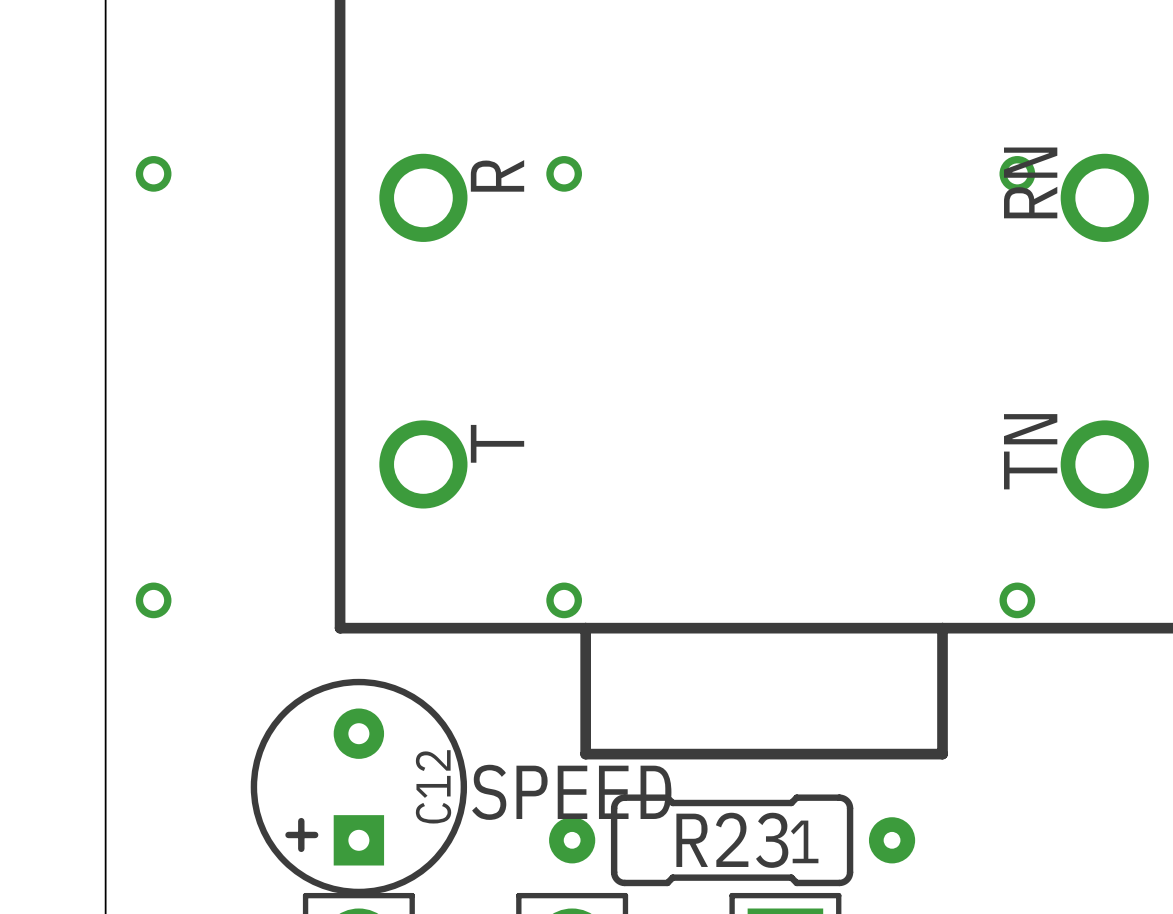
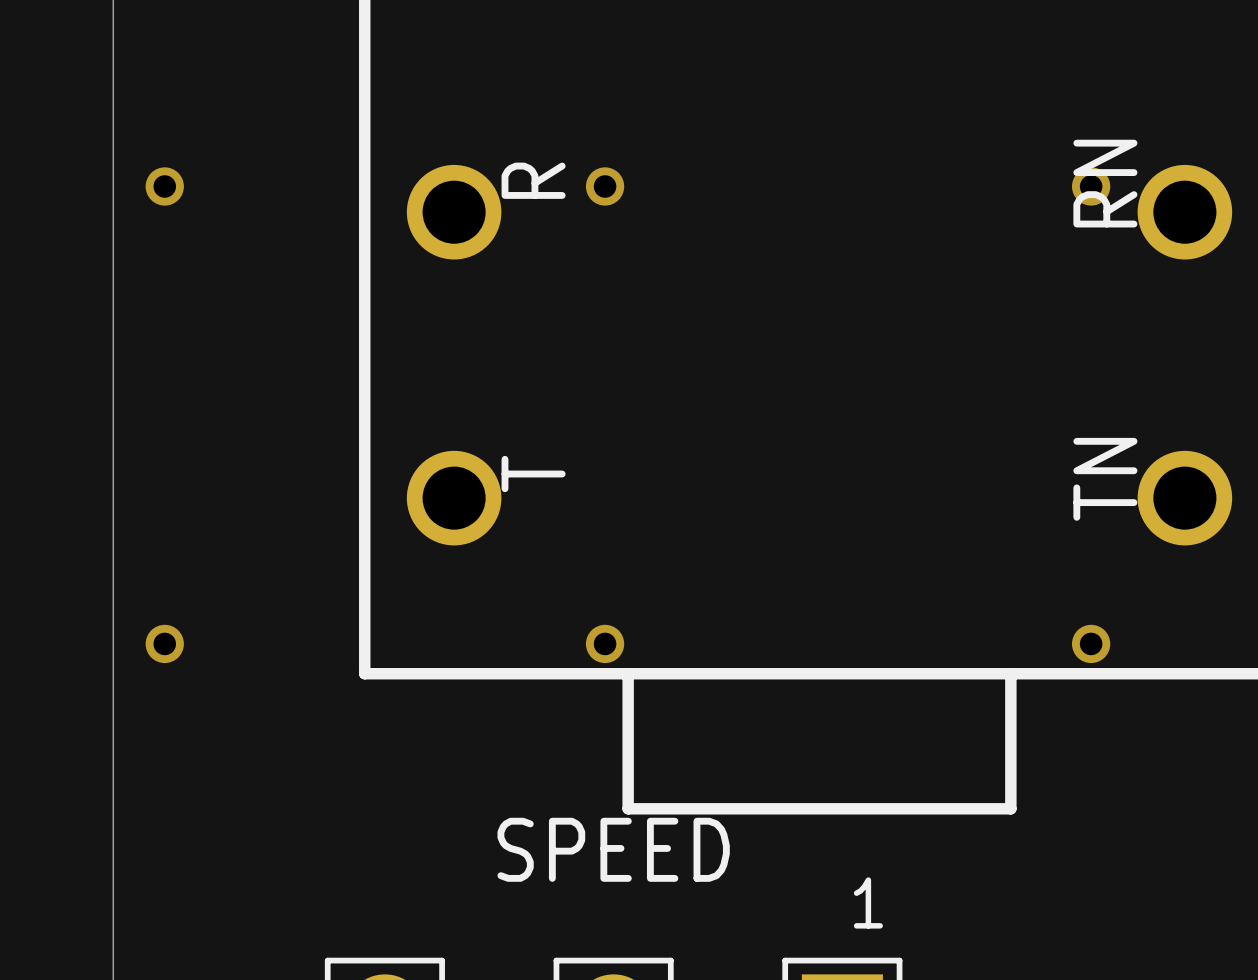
C12: (358, 787) -> none
R23: (732, 840) -> none

